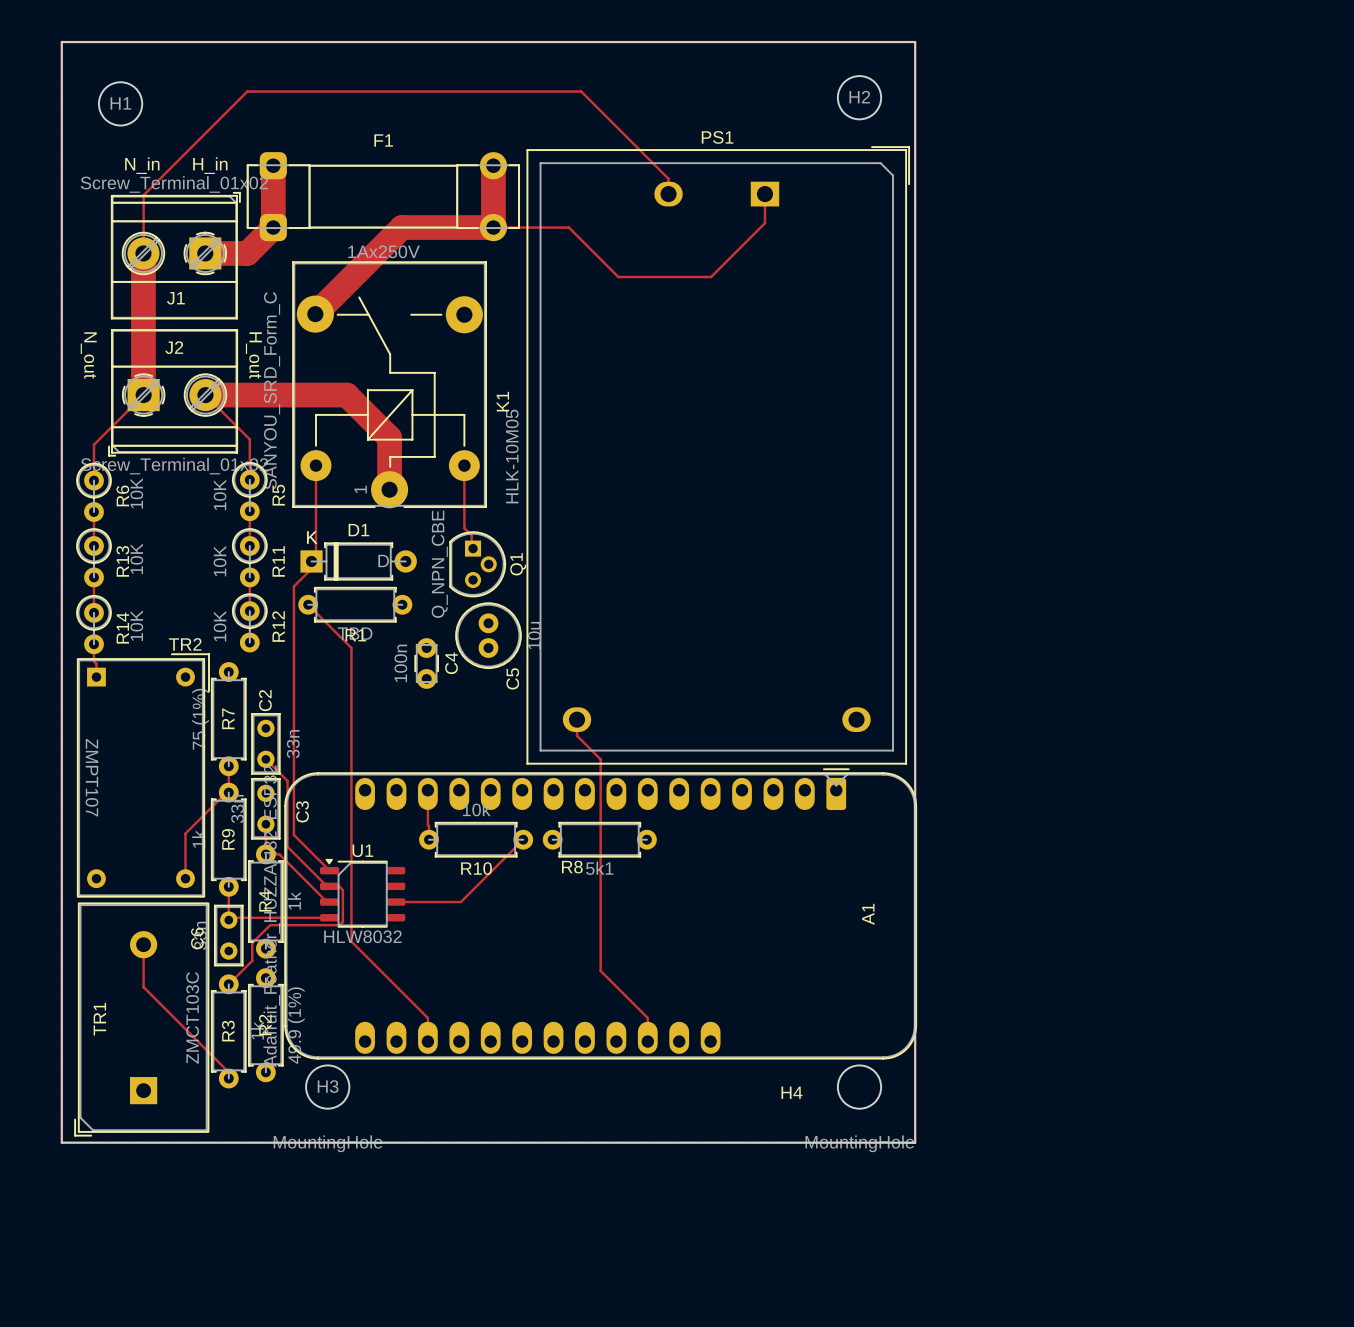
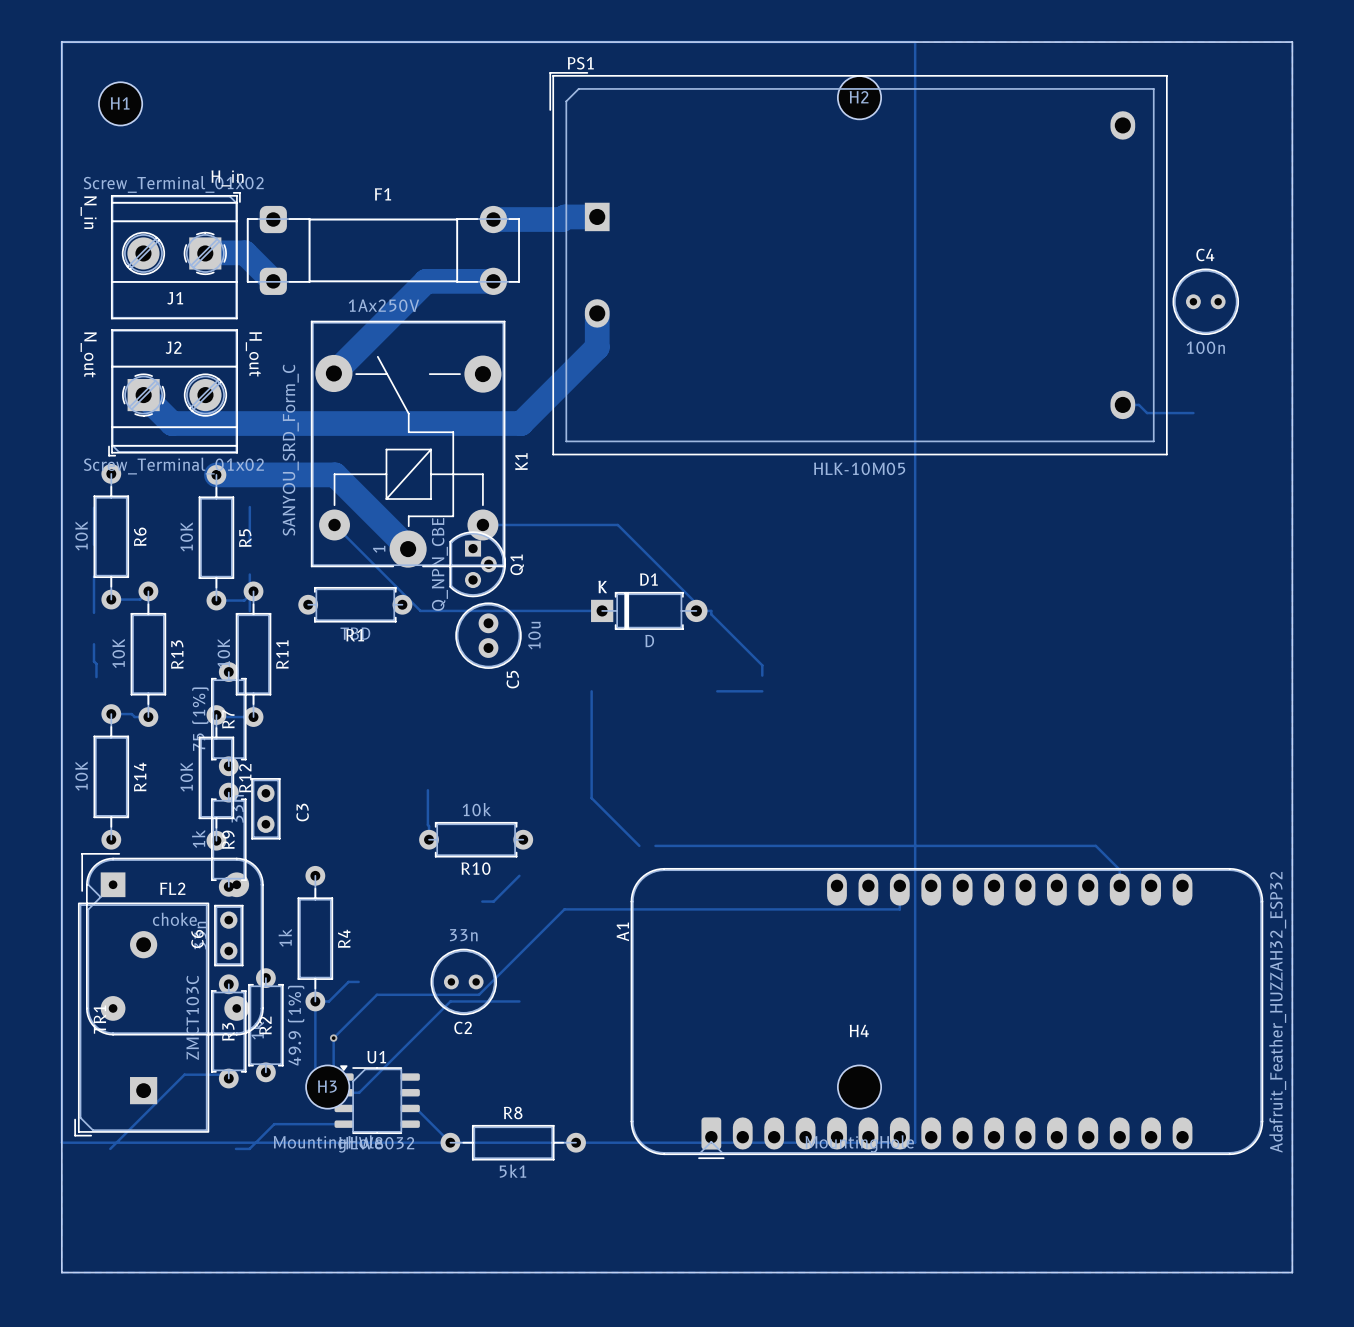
board edge: (915, 42) (915, 1142) (61, 1142) -> (915, 42) (1292, 42) (1292, 1272) (61, 1272) (61, 1142)
PS1 name position: PS1 (717, 137) -> PS1 (580, 63)
text rotation: 0° (142, 165) -> 90° clockwise (88, 212)
text position: N_in (142, 165) -> N_in (88, 212)
text position: H_in (210, 165) -> H_in (227, 178)
track: (273, 165) (273, 227) (247, 253) (205, 253) -> none
track: (493, 165) (493, 227) -> none
track: (668, 194) (668, 178) (581, 91) (247, 91) (143, 195) (143, 394) -> (597, 313) (597, 347) (521, 423) (172, 423) (143, 395)
track: (765, 194) (765, 223) (711, 277) (618, 277) (568, 227) (493, 227) -> none
F1 position: (383, 196) -> (383, 250)
track: none -> (597, 216) (565, 216) (562, 219) (493, 219)
track: (493, 227) (401, 227) (315, 314) -> none
track: none -> (206, 252) (244, 252) (273, 281)
track: none -> (493, 281) (426, 281) (333, 373)
K1 position: (389, 384) -> (408, 444)
track: (143, 395) (93, 444) (93, 476) -> none
track: (205, 395) (249, 439) (249, 475) -> none
track: none -> (1122, 404) (1138, 404) (1147, 413) (1193, 413)
track: (216, 405) (206, 395) (346, 395) (389, 437) (389, 489) -> none
PS1 rotation: 0° (718, 455) -> 90° counterclockwise (858, 263)
R6 footprint: [76, 462, 112, 522] -> [93, 464, 129, 610]
R5 footprint: [232, 462, 268, 522] -> [198, 465, 235, 611]
track: (315, 465) (315, 564) (293, 586) (293, 834) (329, 870) -> none
track: (464, 465) (464, 528) (471, 535) (471, 545) -> none
track: none -> (216, 474) (335, 474) (408, 549)
R6 value position: 10K (136, 493) -> 10K (81, 535)
track: none -> (334, 524) (420, 610) (602, 610)
track: none -> (482, 524) (617, 524) (703, 610)
R13 footprint: [76, 528, 112, 588] -> [130, 581, 167, 727]
R11 footprint: [232, 528, 268, 588] -> [235, 581, 272, 727]
R13 value position: 10K (136, 558) -> 10K (118, 653)
D1 position: (358, 561) -> (649, 610)
D1 value position: D (383, 561) -> D (649, 641)
track: none -> (148, 591) (140, 599) (111, 599)
track: none -> (253, 591) (244, 600) (216, 600)
R12 footprint: [232, 593, 268, 653] -> [198, 705, 235, 851]
R14 footprint: [76, 595, 112, 655] -> [93, 704, 129, 850]
track: (308, 604) (351, 648) (351, 941) (427, 1018) (427, 1041) -> none
track: none -> (696, 610) (711, 610) (711, 614) (762, 665) (762, 675)
R14 value position: 10K (136, 625) -> 10K (81, 776)
C4 footprint: [414, 638, 439, 689] -> [1172, 268, 1239, 335]
C4 value position: 100n (400, 663) -> 100n (1205, 347)
C4 name position: C4 (451, 663) -> C4 (1205, 254)
track: none -> (591, 691) (591, 798) (639, 845)
track: none -> (717, 691) (762, 691)
C2 name position: C2 (265, 700) -> C2 (463, 1027)
C2 footprint: [251, 713, 281, 775] -> [430, 948, 497, 1016]
track: none -> (111, 714) (131, 714) (134, 717) (148, 717)
track: none -> (216, 715) (218, 717) (253, 717)
track: (577, 719) (577, 735) (600, 759) (600, 970) (647, 1018) (647, 1041) -> none
C2 value position: 33n (293, 744) -> 33n (463, 935)
track: (265, 759) (287, 780) (287, 846) (327, 886) (339, 886) (342, 890) (342, 921) (339, 925) (270, 925) (252, 943) (252, 960) (228, 984) -> none
track: (228, 763) (228, 790) (185, 833) (185, 878) -> none
TR2: ZMPT107 (143, 775) -> none
R8 footprint: [542, 822, 657, 858] -> [440, 1125, 586, 1161]
track: (265, 824) (265, 854) (279, 854) (327, 902) (329, 902) -> none
track: (523, 839) (460, 902) (395, 902) -> none
R4 footprint: [248, 844, 284, 959] -> [297, 865, 334, 1012]
track: none -> (655, 845) (1095, 845) (1119, 869) (1119, 885)
R8 name position: R8 (572, 867) -> R8 (513, 1113)
track: none -> (519, 875) (493, 901) (482, 901)
track: (228, 884) (228, 913) (232, 917) (329, 917) -> none
track: none -> (899, 885) (899, 909) (564, 909) (479, 994) (376, 994) (333, 1038) (333, 1066) (344, 1077)
U1 position: (362, 893) -> (377, 1099)
R4 value position: 1k (294, 900) -> 1k (285, 937)
R4 name position: R4 (265, 901) -> R4 (344, 938)
A1 rotation: 0° (600, 913) -> 180° (946, 1013)
A1 name position: A1 (868, 914) -> A1 (622, 931)
track: (143, 944) (143, 987) (228, 1072) -> none
FL2: none -> choke (172, 944)
track: none -> (358, 981) (348, 981) (328, 1001) (315, 1001) (315, 1081) (344, 1108)
track: none -> (519, 1001) (450, 1001) (359, 1092) (344, 1092)
via: none -> (333, 1038)
track: none -> (235, 1074) (184, 1074) (110, 1148)
H4 name position: H4 (791, 1092) -> H4 (859, 1030)
track: none -> (410, 1108) (416, 1108) (450, 1142)
track: none -> (344, 1124) (274, 1124) (249, 1148) (235, 1148)

